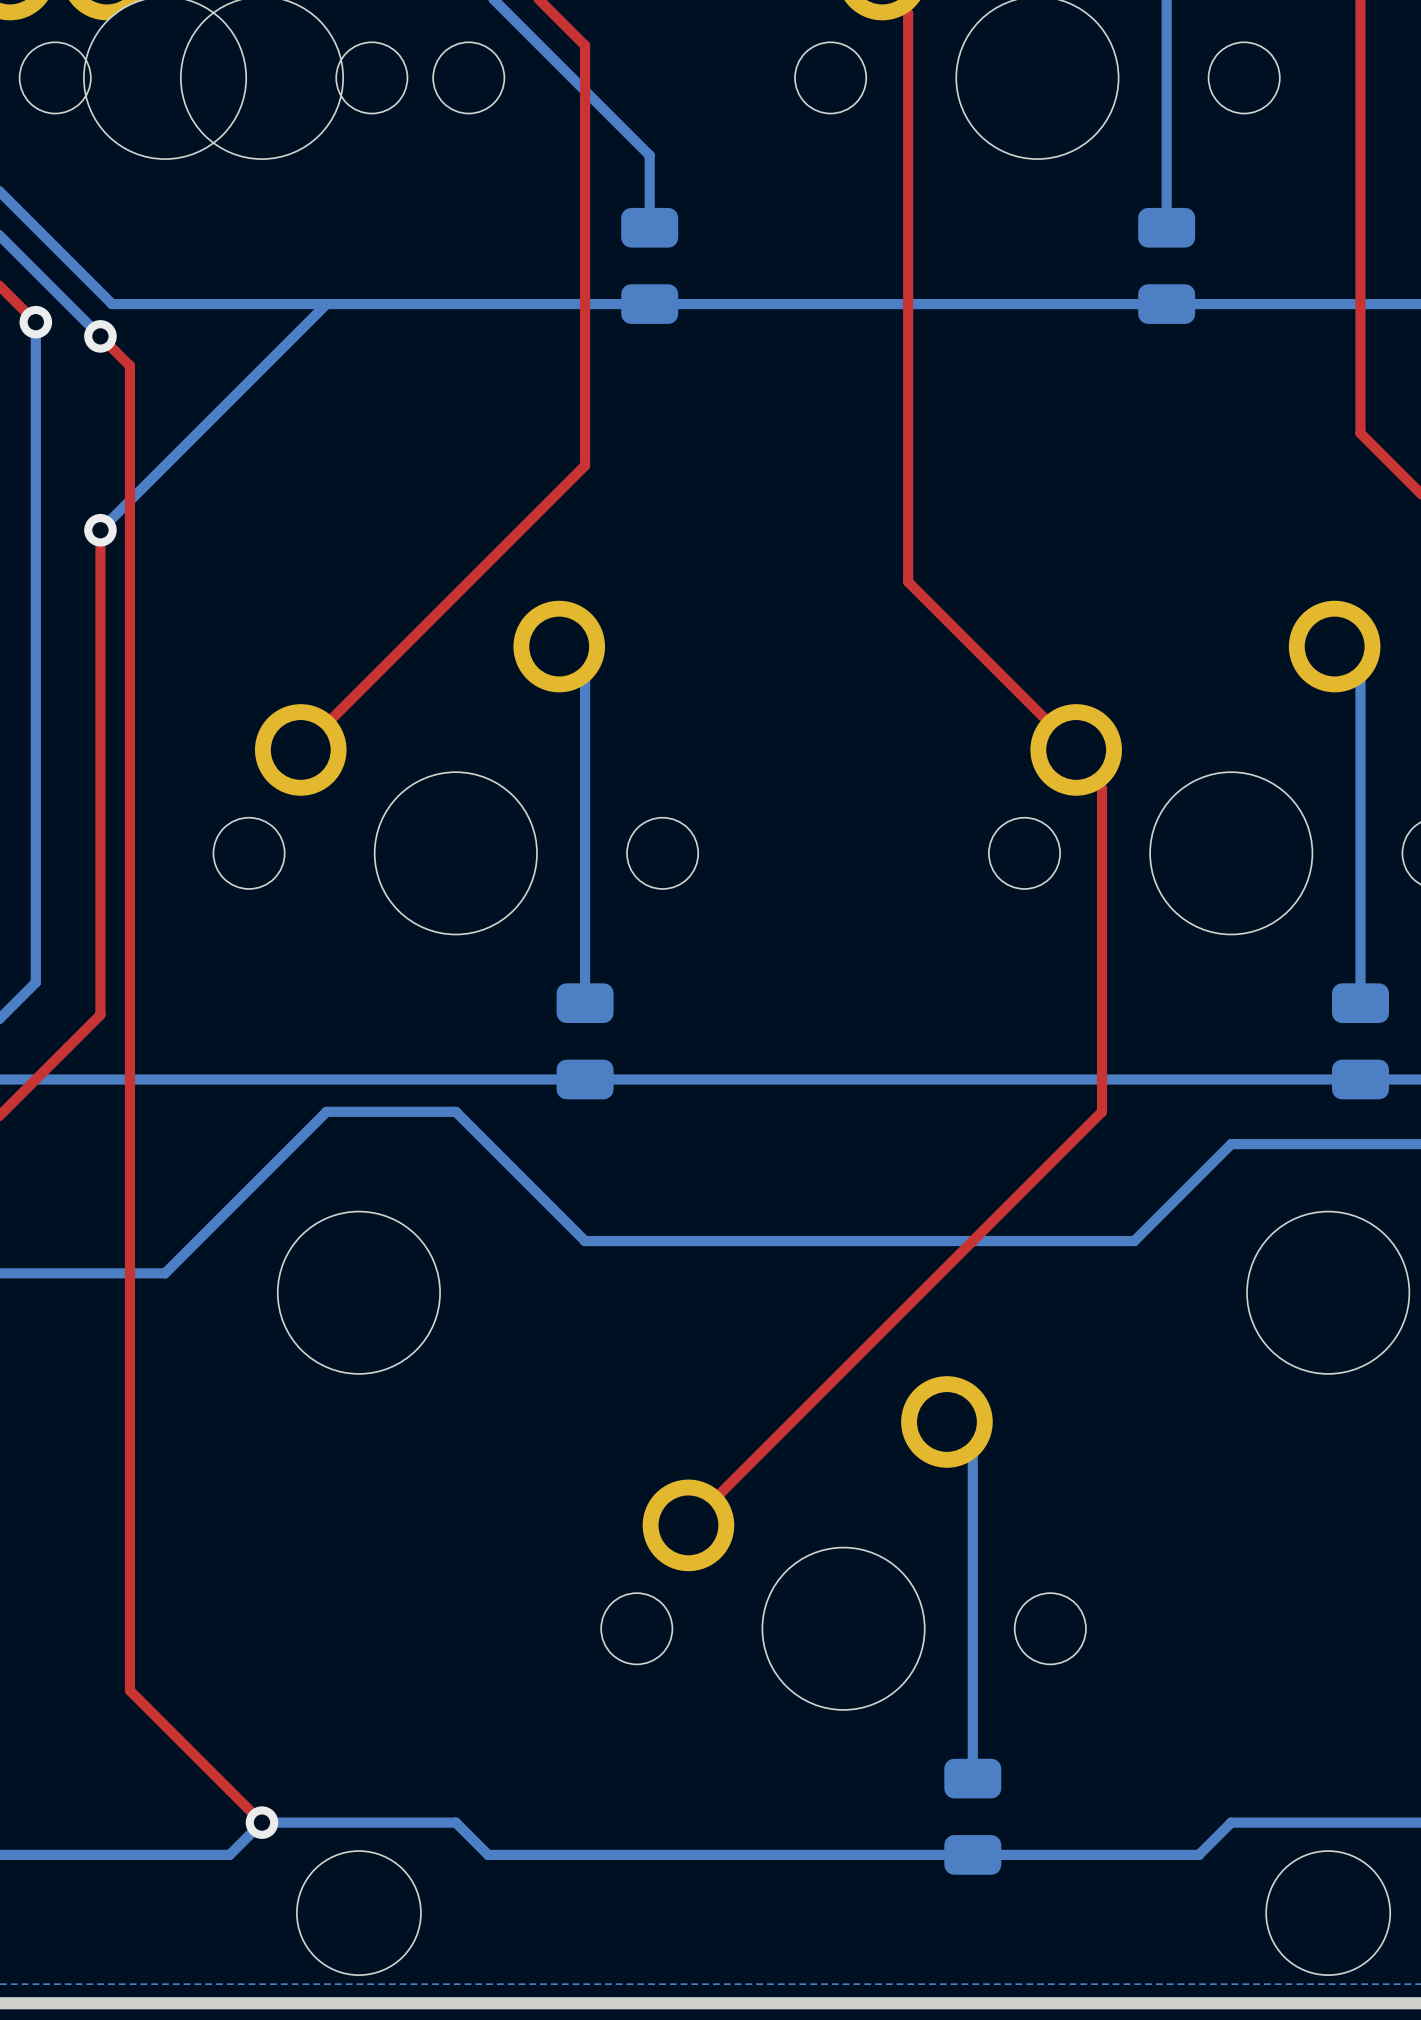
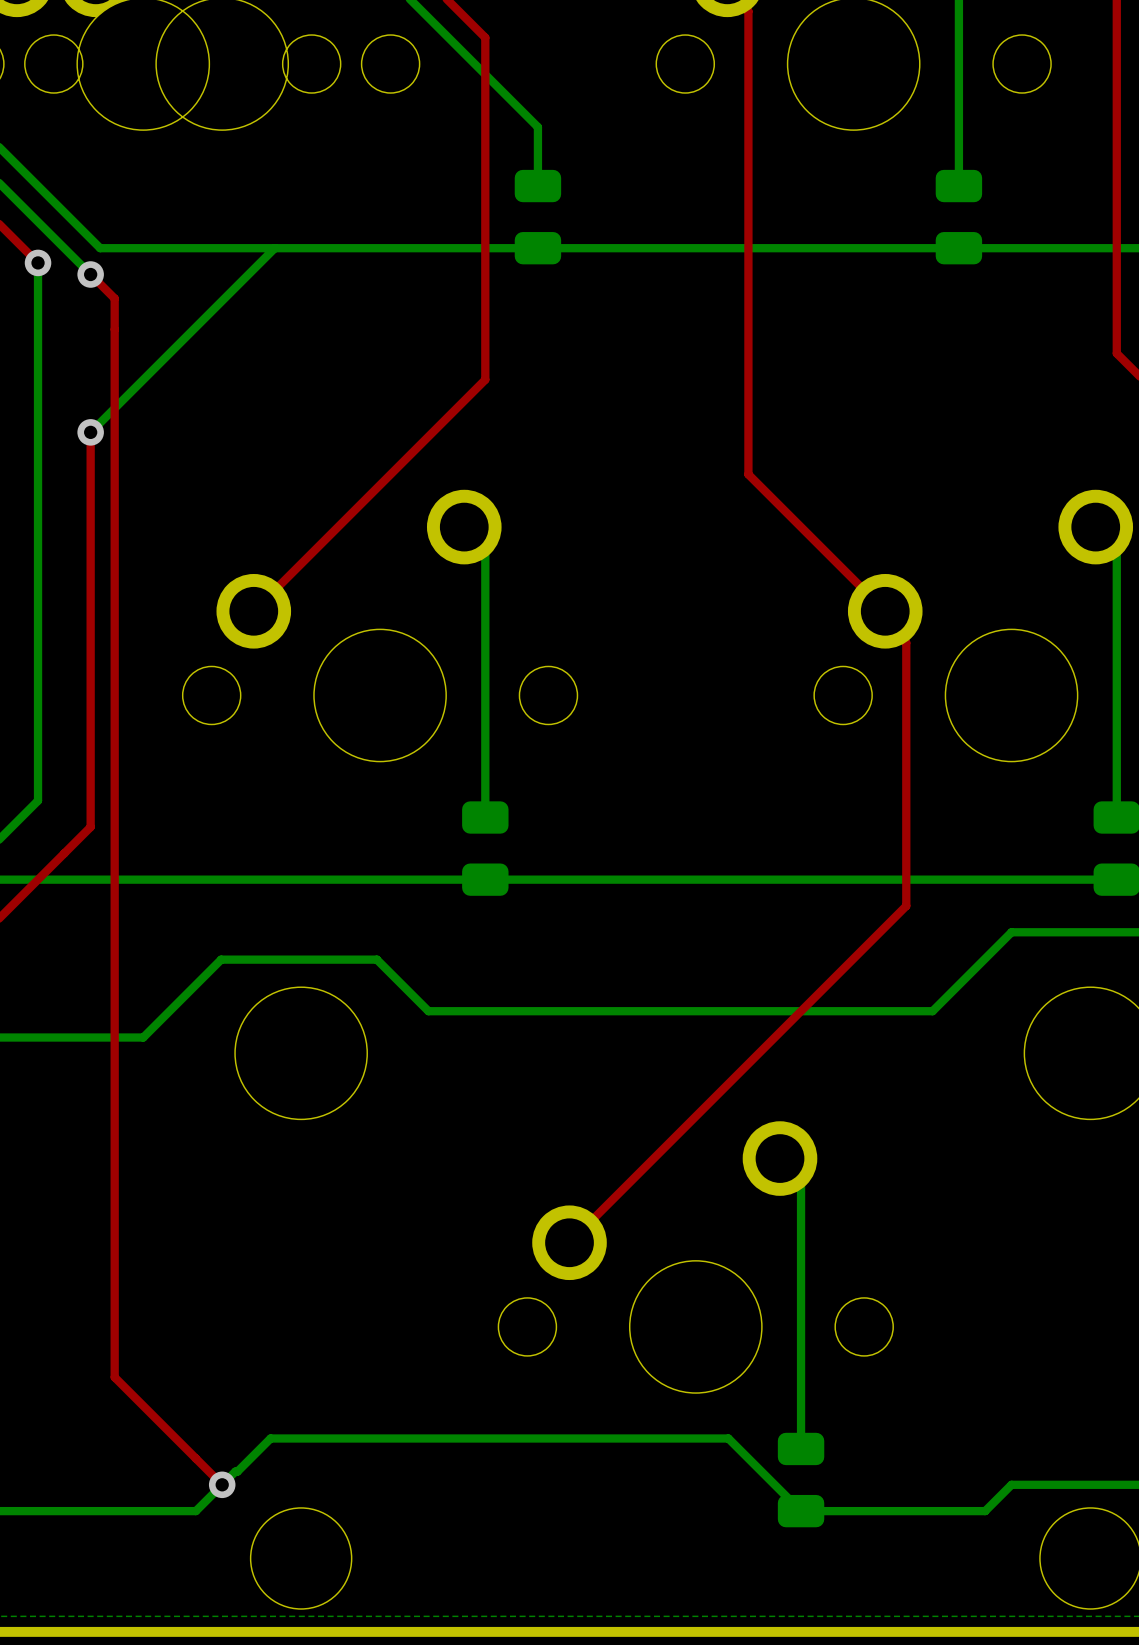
bottom track: (260, 1177) (326, 1111) (455, 1111) (585, 1241) -> (221, 959) (376, 959) (428, 1011) (485, 1011)
bottom track: (261, 1822) (455, 1822) (488, 1854) (972, 1854) -> (222, 1484) (270, 1438) (728, 1438) (801, 1511)

